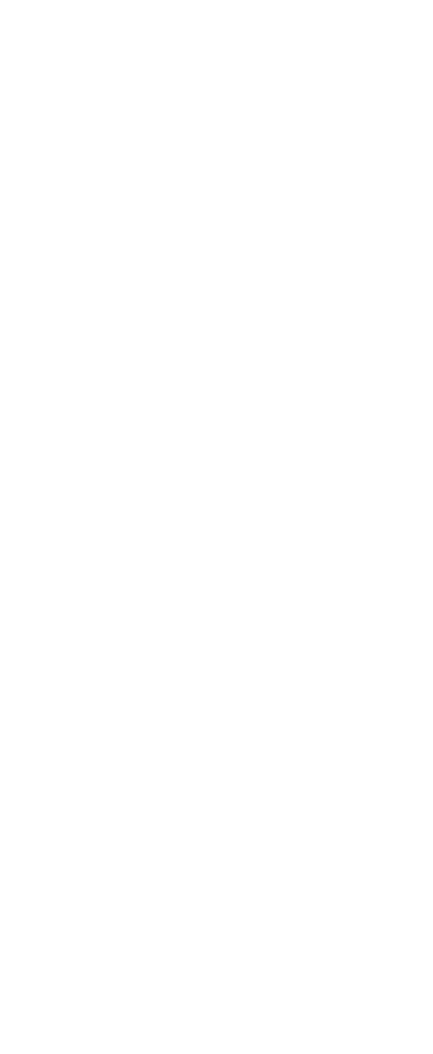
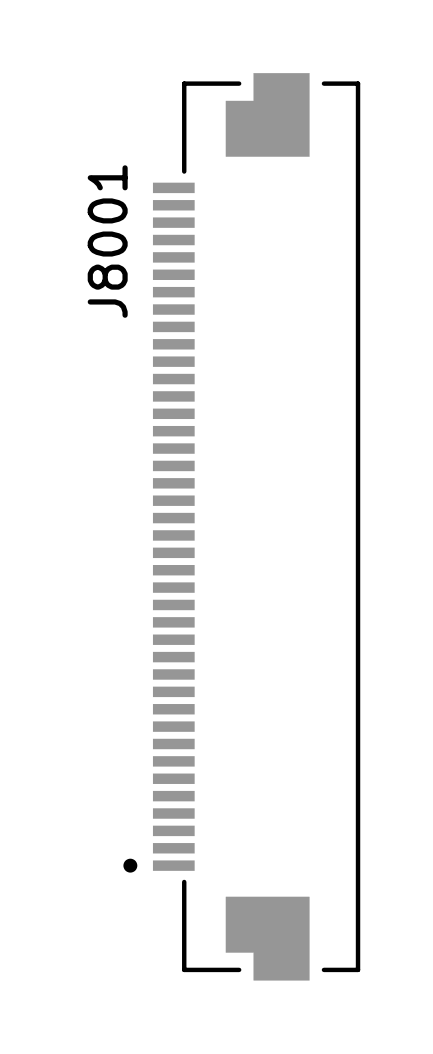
J8001: none -> (241, 526)

